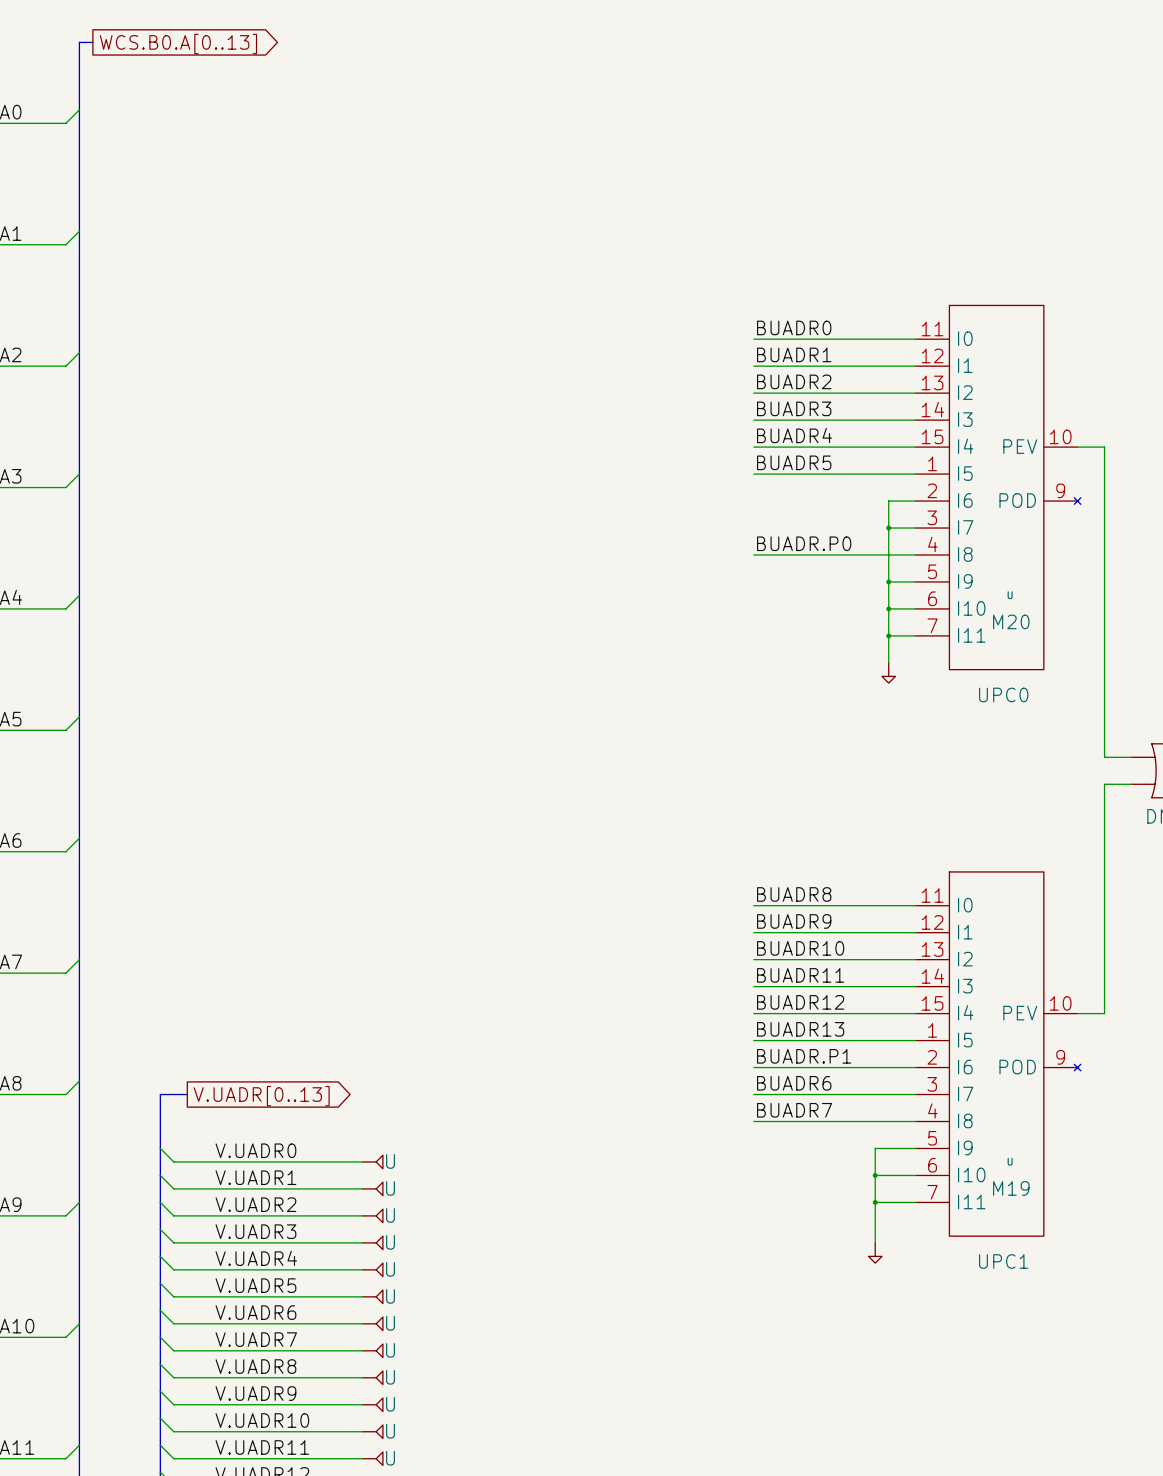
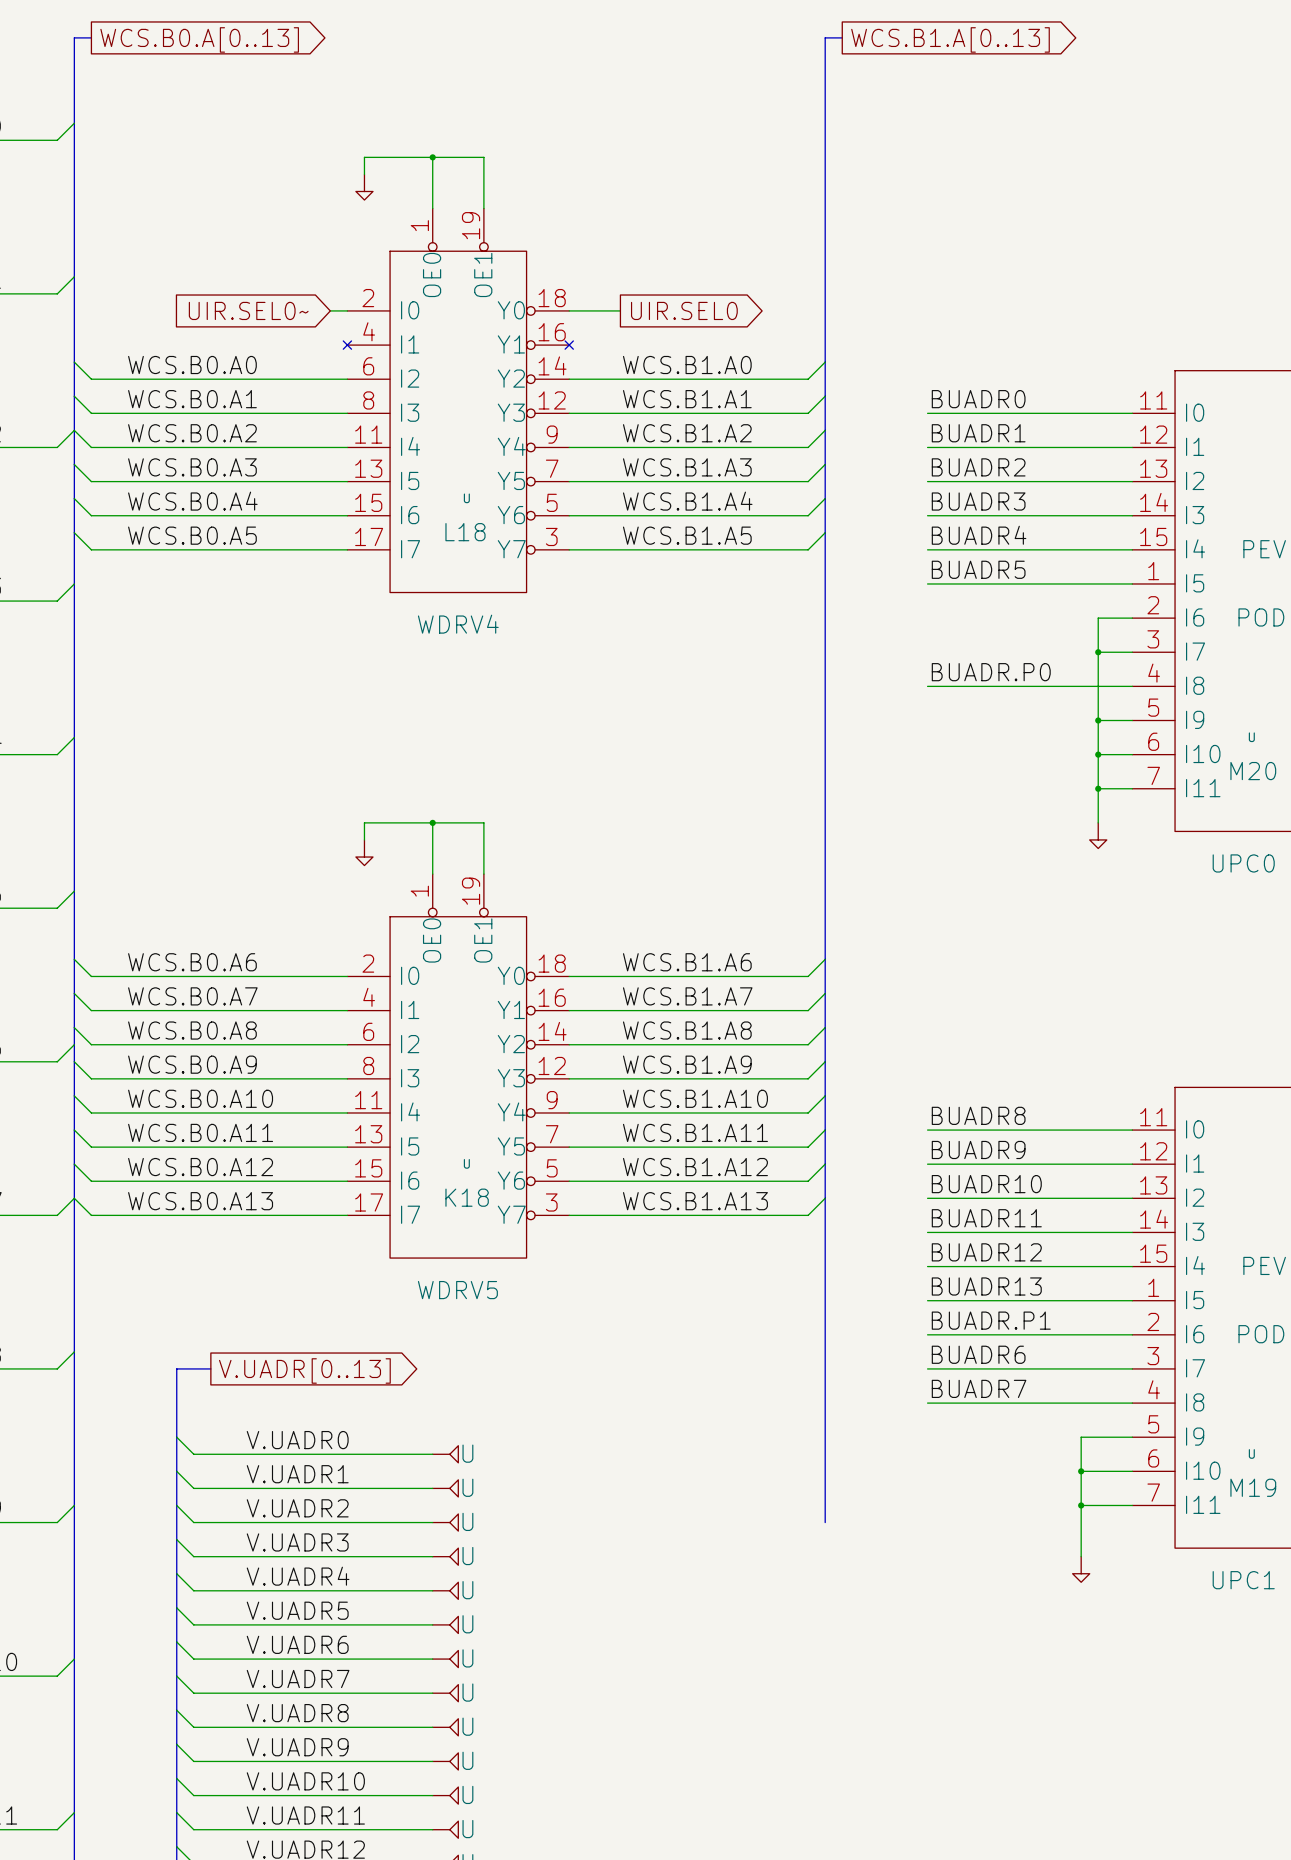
bus: none -> (842, 37) (825, 37) (825, 1522)
global label: none -> WCS.B1.A[0..13] (950, 39)
wire: none -> (432, 157) (432, 208)
junction: none -> (432, 157)
wire: none -> (364, 174) (364, 157) (483, 157) (483, 208)
power symbol: none -> (364, 187)
global label: none -> UIR.SEL0~ (248, 310)
wire: none -> (330, 310) (347, 310)
wire: none -> (569, 310) (620, 310)
global label: none -> UIR.SEL0 (684, 310)
no-connect mark: none -> (347, 345)
no-connect mark: none -> (569, 345)
wire: none -> (74, 362) (91, 379) (347, 379)
wire: none -> (825, 362) (808, 379) (569, 379)
label: none -> WCS.B0.A0 (192, 365)
label: none -> WCS.B1.A0 (687, 365)
wire: none -> (74, 396) (91, 413) (347, 413)
wire: none -> (825, 396) (808, 413) (569, 413)
label: none -> WCS.B0.A1 (192, 399)
label: none -> WCS.B1.A1 (687, 399)
U: none -> (458, 400)
wire: none -> (74, 430) (91, 447) (347, 447)
wire: none -> (825, 430) (808, 447) (569, 447)
label: none -> WCS.B0.A2 (192, 433)
label: none -> WCS.B1.A2 (687, 433)
wire: none -> (74, 464) (91, 481) (347, 481)
wire: none -> (825, 464) (808, 481) (569, 481)
label: none -> WCS.B0.A3 (192, 467)
label: none -> WCS.B1.A3 (687, 467)
wire: none -> (74, 498) (91, 515) (347, 515)
wire: none -> (825, 498) (808, 515) (569, 515)
label: none -> WCS.B0.A4 (192, 501)
label: none -> WCS.B1.A4 (687, 501)
wire: none -> (74, 532) (91, 549) (347, 549)
wire: none -> (825, 532) (808, 549) (569, 549)
label: none -> WCS.B0.A5 (192, 535)
label: none -> WCS.B1.A5 (687, 535)
wire: none -> (432, 822) (432, 874)
junction: none -> (432, 822)
wire: none -> (364, 839) (364, 822) (483, 822) (483, 874)
power symbol: none -> (364, 853)
wire: none -> (74, 959) (91, 976) (347, 976)
wire: none -> (825, 959) (808, 976) (569, 976)
label: none -> WCS.B0.A6 (192, 962)
label: none -> WCS.B1.A6 (687, 962)
wire: none -> (74, 993) (91, 1010) (347, 1010)
wire: none -> (825, 993) (808, 1010) (569, 1010)
label: none -> WCS.B0.A7 (192, 996)
label: none -> WCS.B1.A7 (687, 996)
wire: none -> (74, 1027) (91, 1044) (347, 1044)
wire: none -> (825, 1027) (808, 1044) (569, 1044)
label: none -> WCS.B0.A8 (192, 1030)
label: none -> WCS.B1.A8 (687, 1030)
wire: none -> (74, 1061) (91, 1078) (347, 1078)
wire: none -> (825, 1061) (808, 1078) (569, 1078)
label: none -> WCS.B0.A9 (192, 1064)
label: none -> WCS.B1.A9 (687, 1064)
U: none -> (458, 1066)
wire: none -> (74, 1095) (91, 1112) (347, 1112)
wire: none -> (825, 1095) (808, 1112) (569, 1112)
label: none -> WCS.B0.A10 (200, 1098)
label: none -> WCS.B1.A10 (695, 1098)
wire: none -> (74, 1130) (91, 1147) (347, 1147)
wire: none -> (825, 1130) (808, 1147) (569, 1147)
label: none -> WCS.B0.A11 (200, 1132)
label: none -> WCS.B1.A11 (695, 1132)
wire: none -> (74, 1164) (91, 1181) (347, 1181)
wire: none -> (825, 1164) (808, 1181) (569, 1181)
label: none -> WCS.B0.A12 (200, 1167)
label: none -> WCS.B1.A12 (695, 1167)
wire: none -> (74, 1198) (91, 1215) (347, 1215)
wire: none -> (825, 1198) (808, 1215) (569, 1215)
label: none -> WCS.B0.A13 (200, 1201)
label: none -> WCS.B1.A13 (695, 1201)

